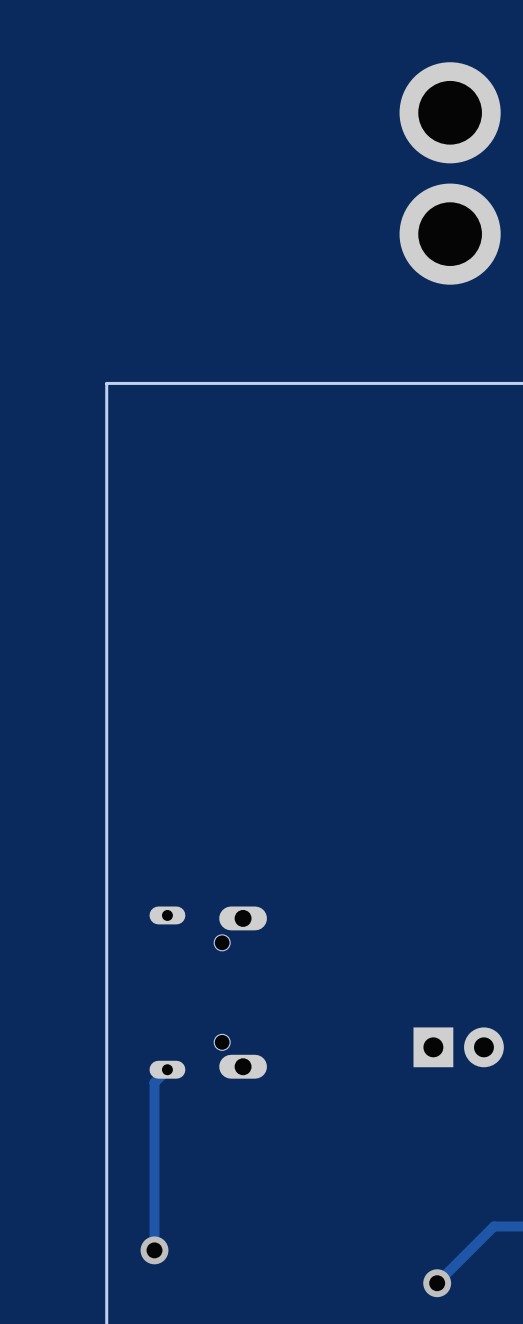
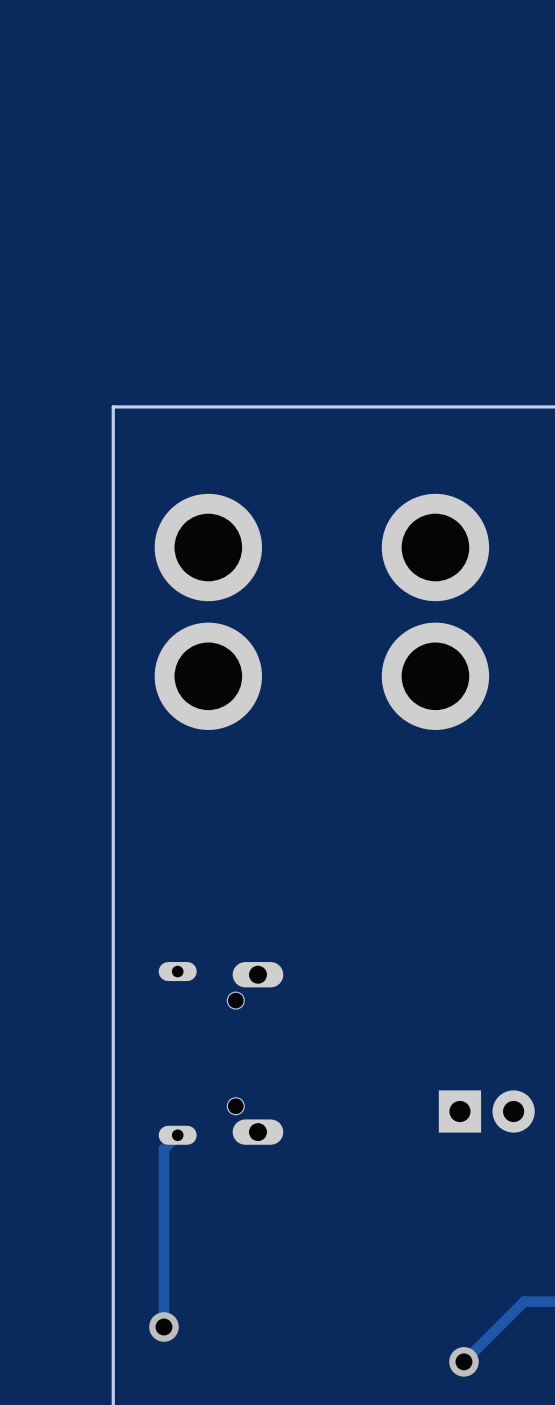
part: (450, 173) -> none
part: none -> (208, 611)
part: none -> (435, 611)

